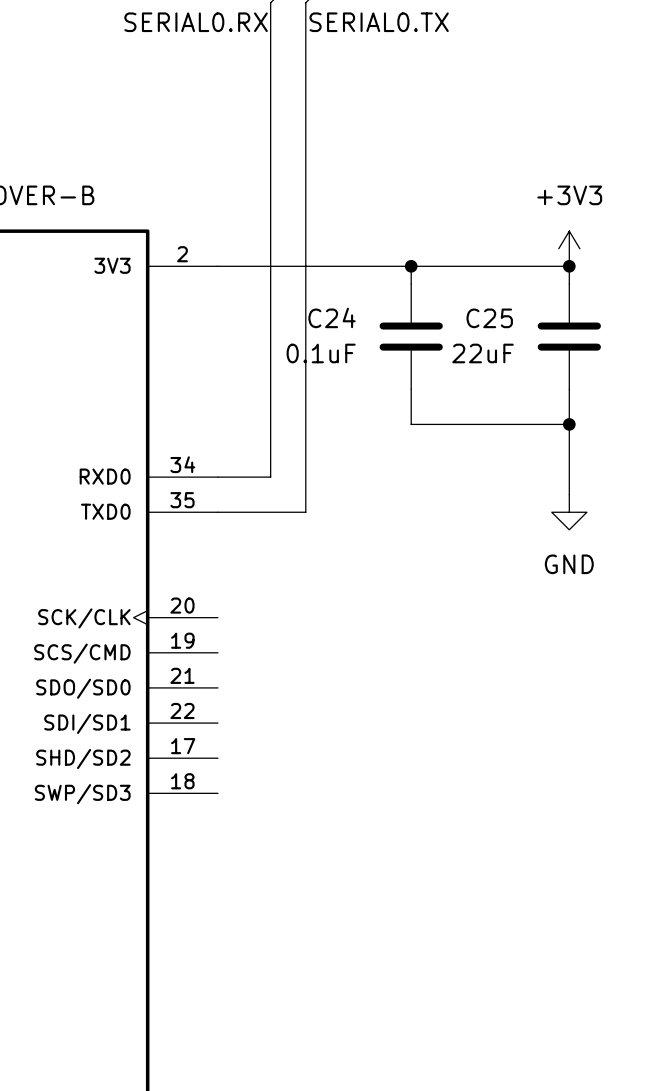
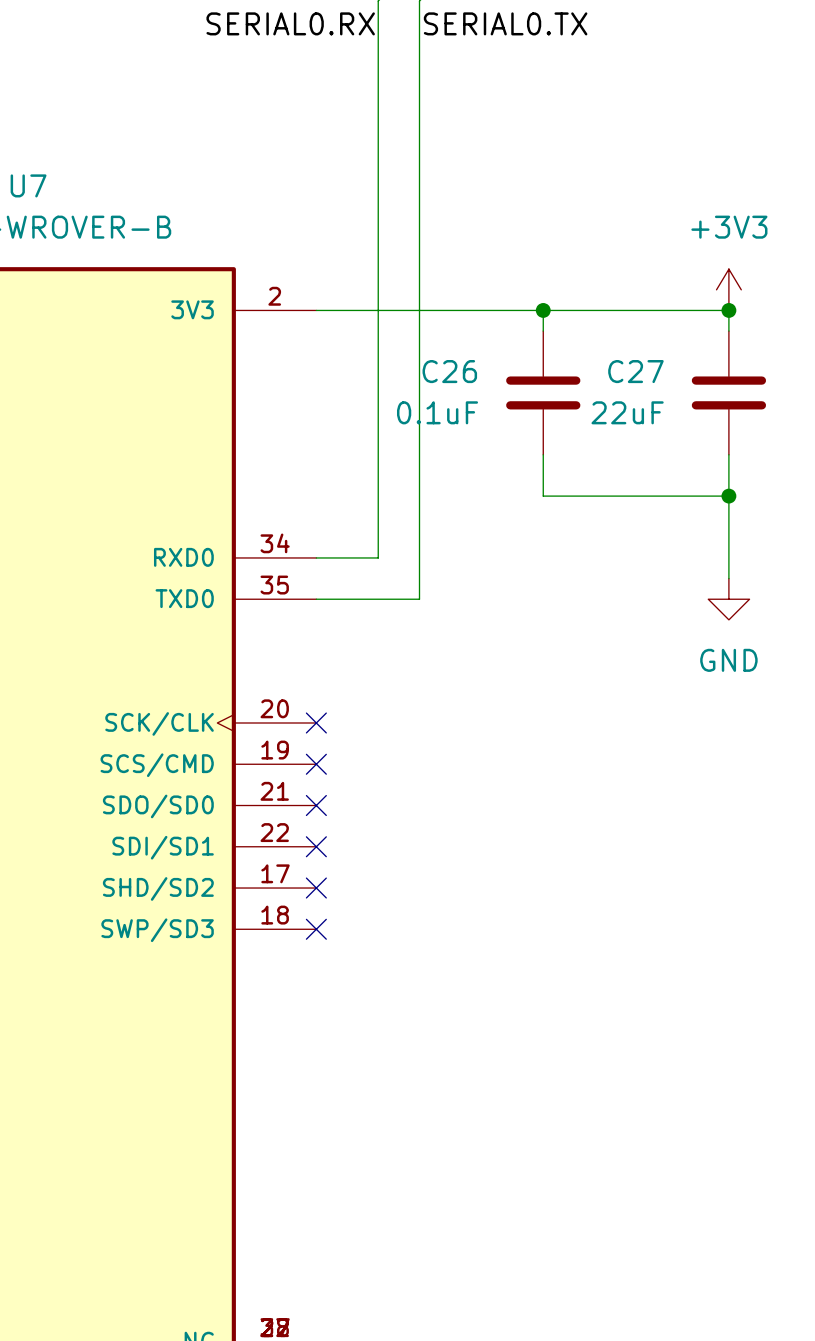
C24 name: C24 (332, 317) -> C26 (449, 371)
C25 name: C25 (489, 318) -> C27 (635, 371)
no-connect mark: none -> (316, 723)
no-connect mark: none -> (316, 764)
no-connect mark: none -> (316, 805)
no-connect mark: none -> (316, 846)
no-connect mark: none -> (316, 888)
no-connect mark: none -> (316, 929)

